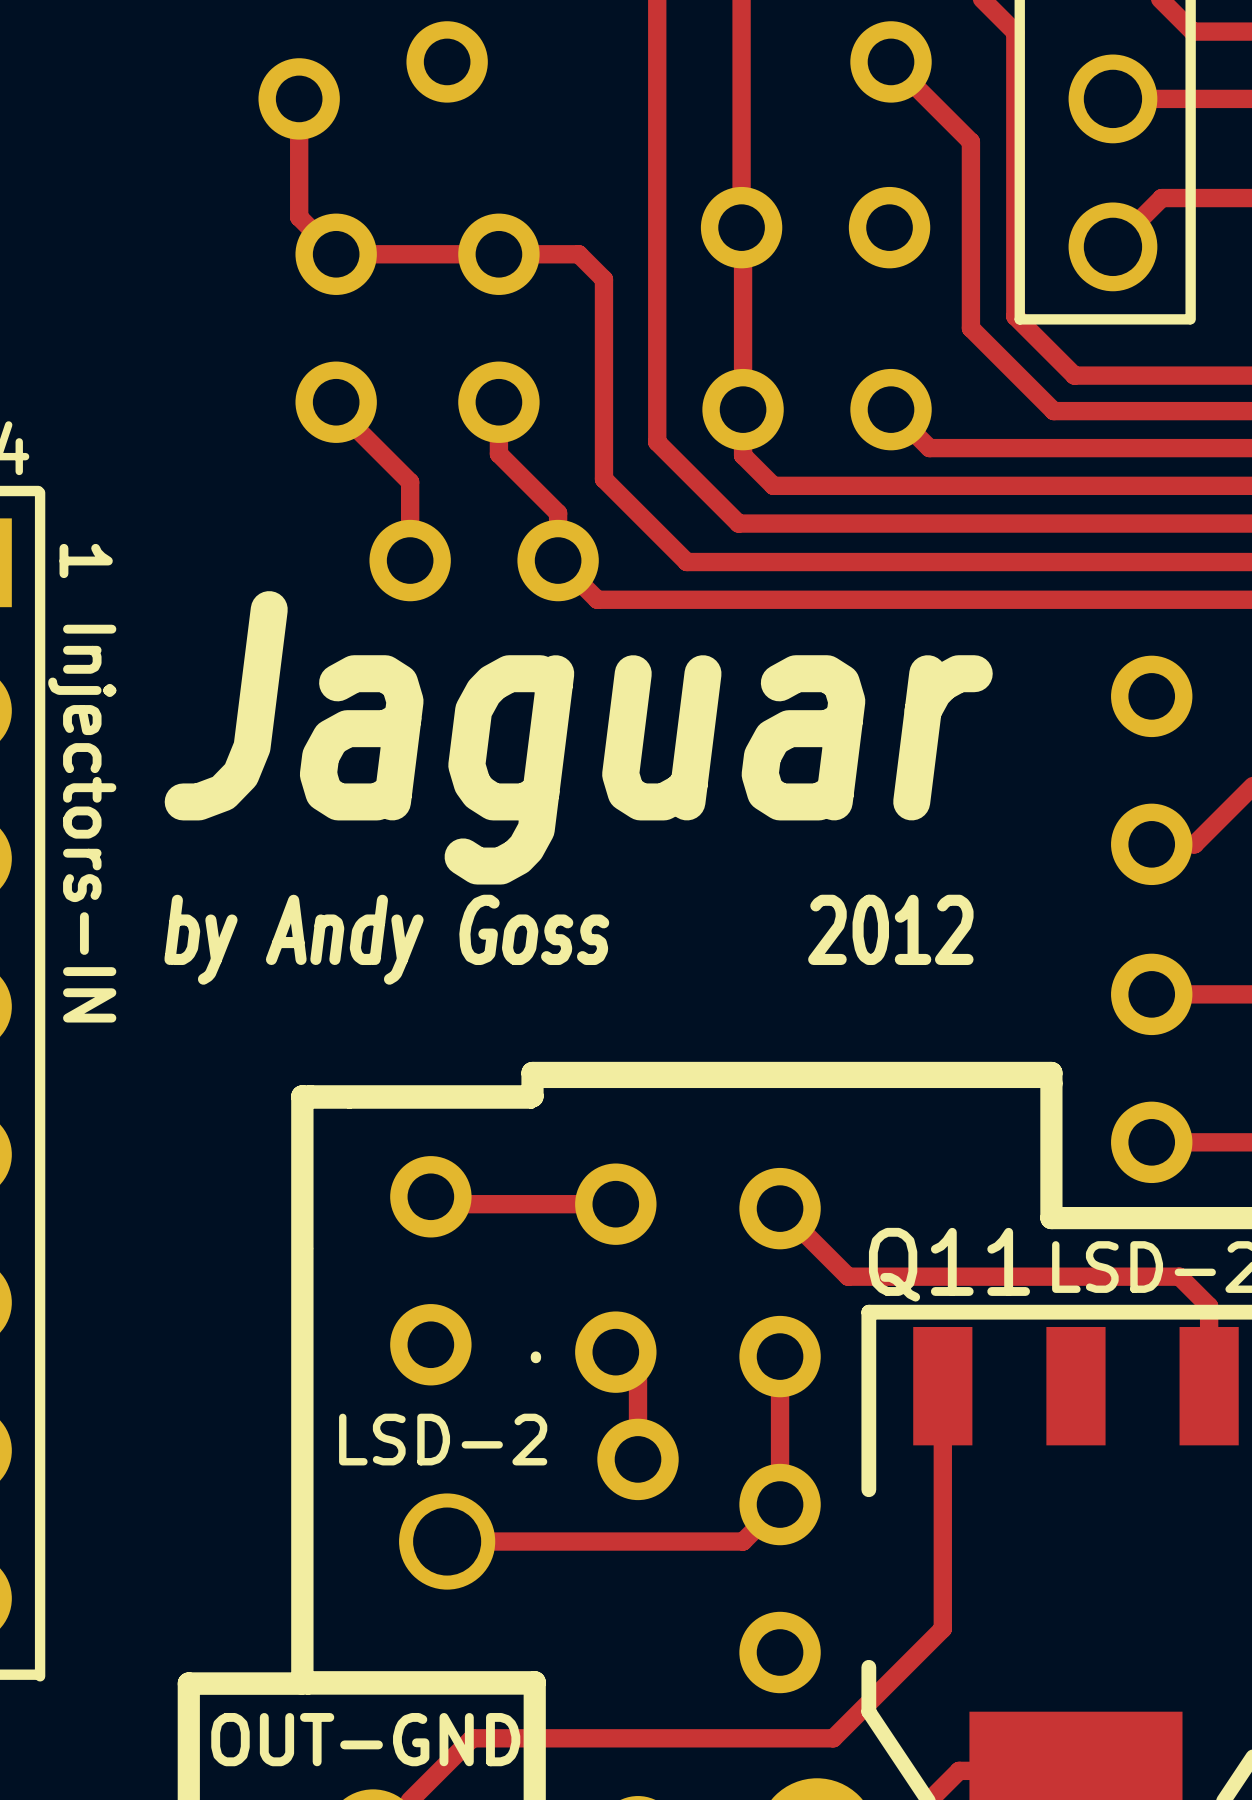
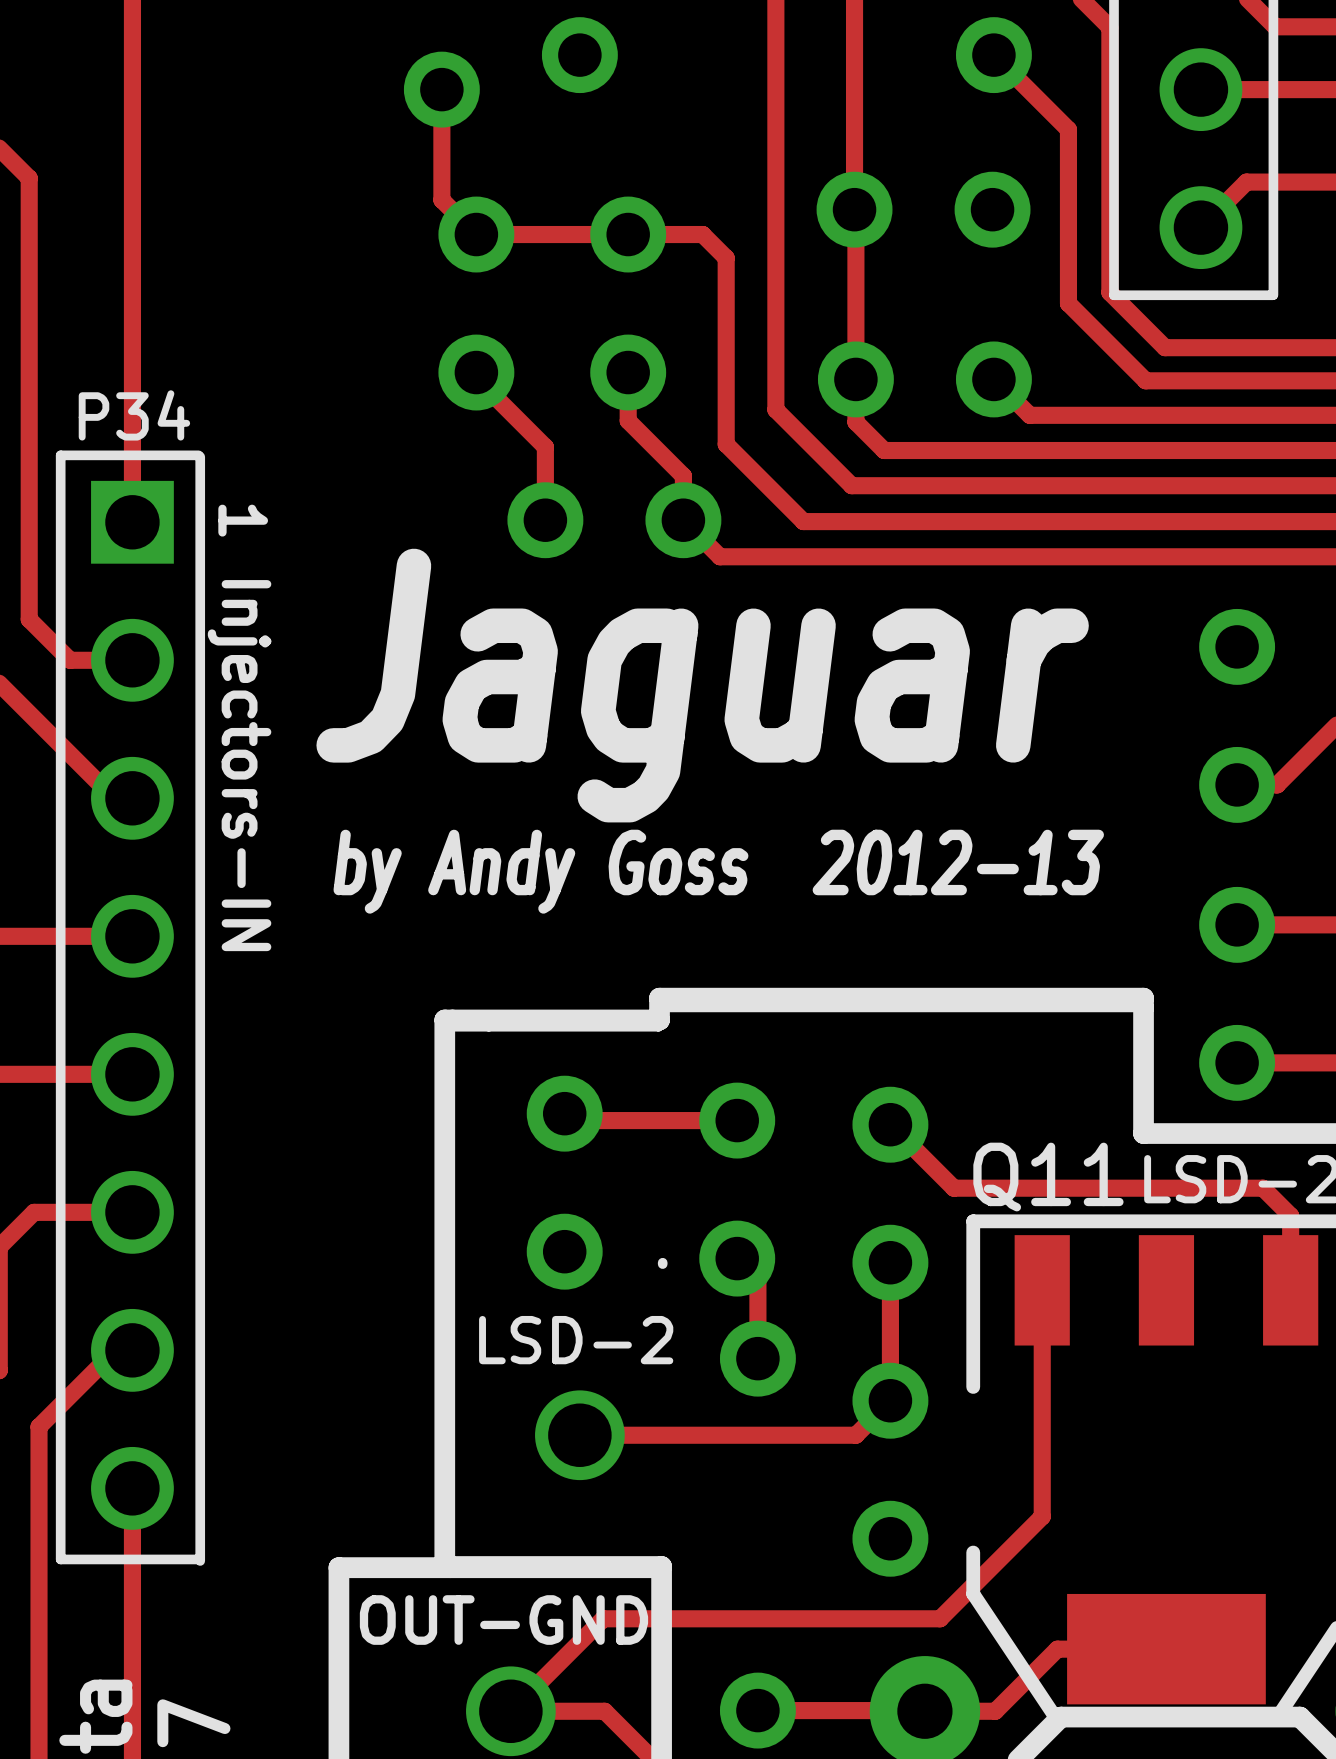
text: 2012 (890, 929) -> none
text: by Andy Goss (386, 939) -> by Andy Goss 2012-13 (718, 871)

